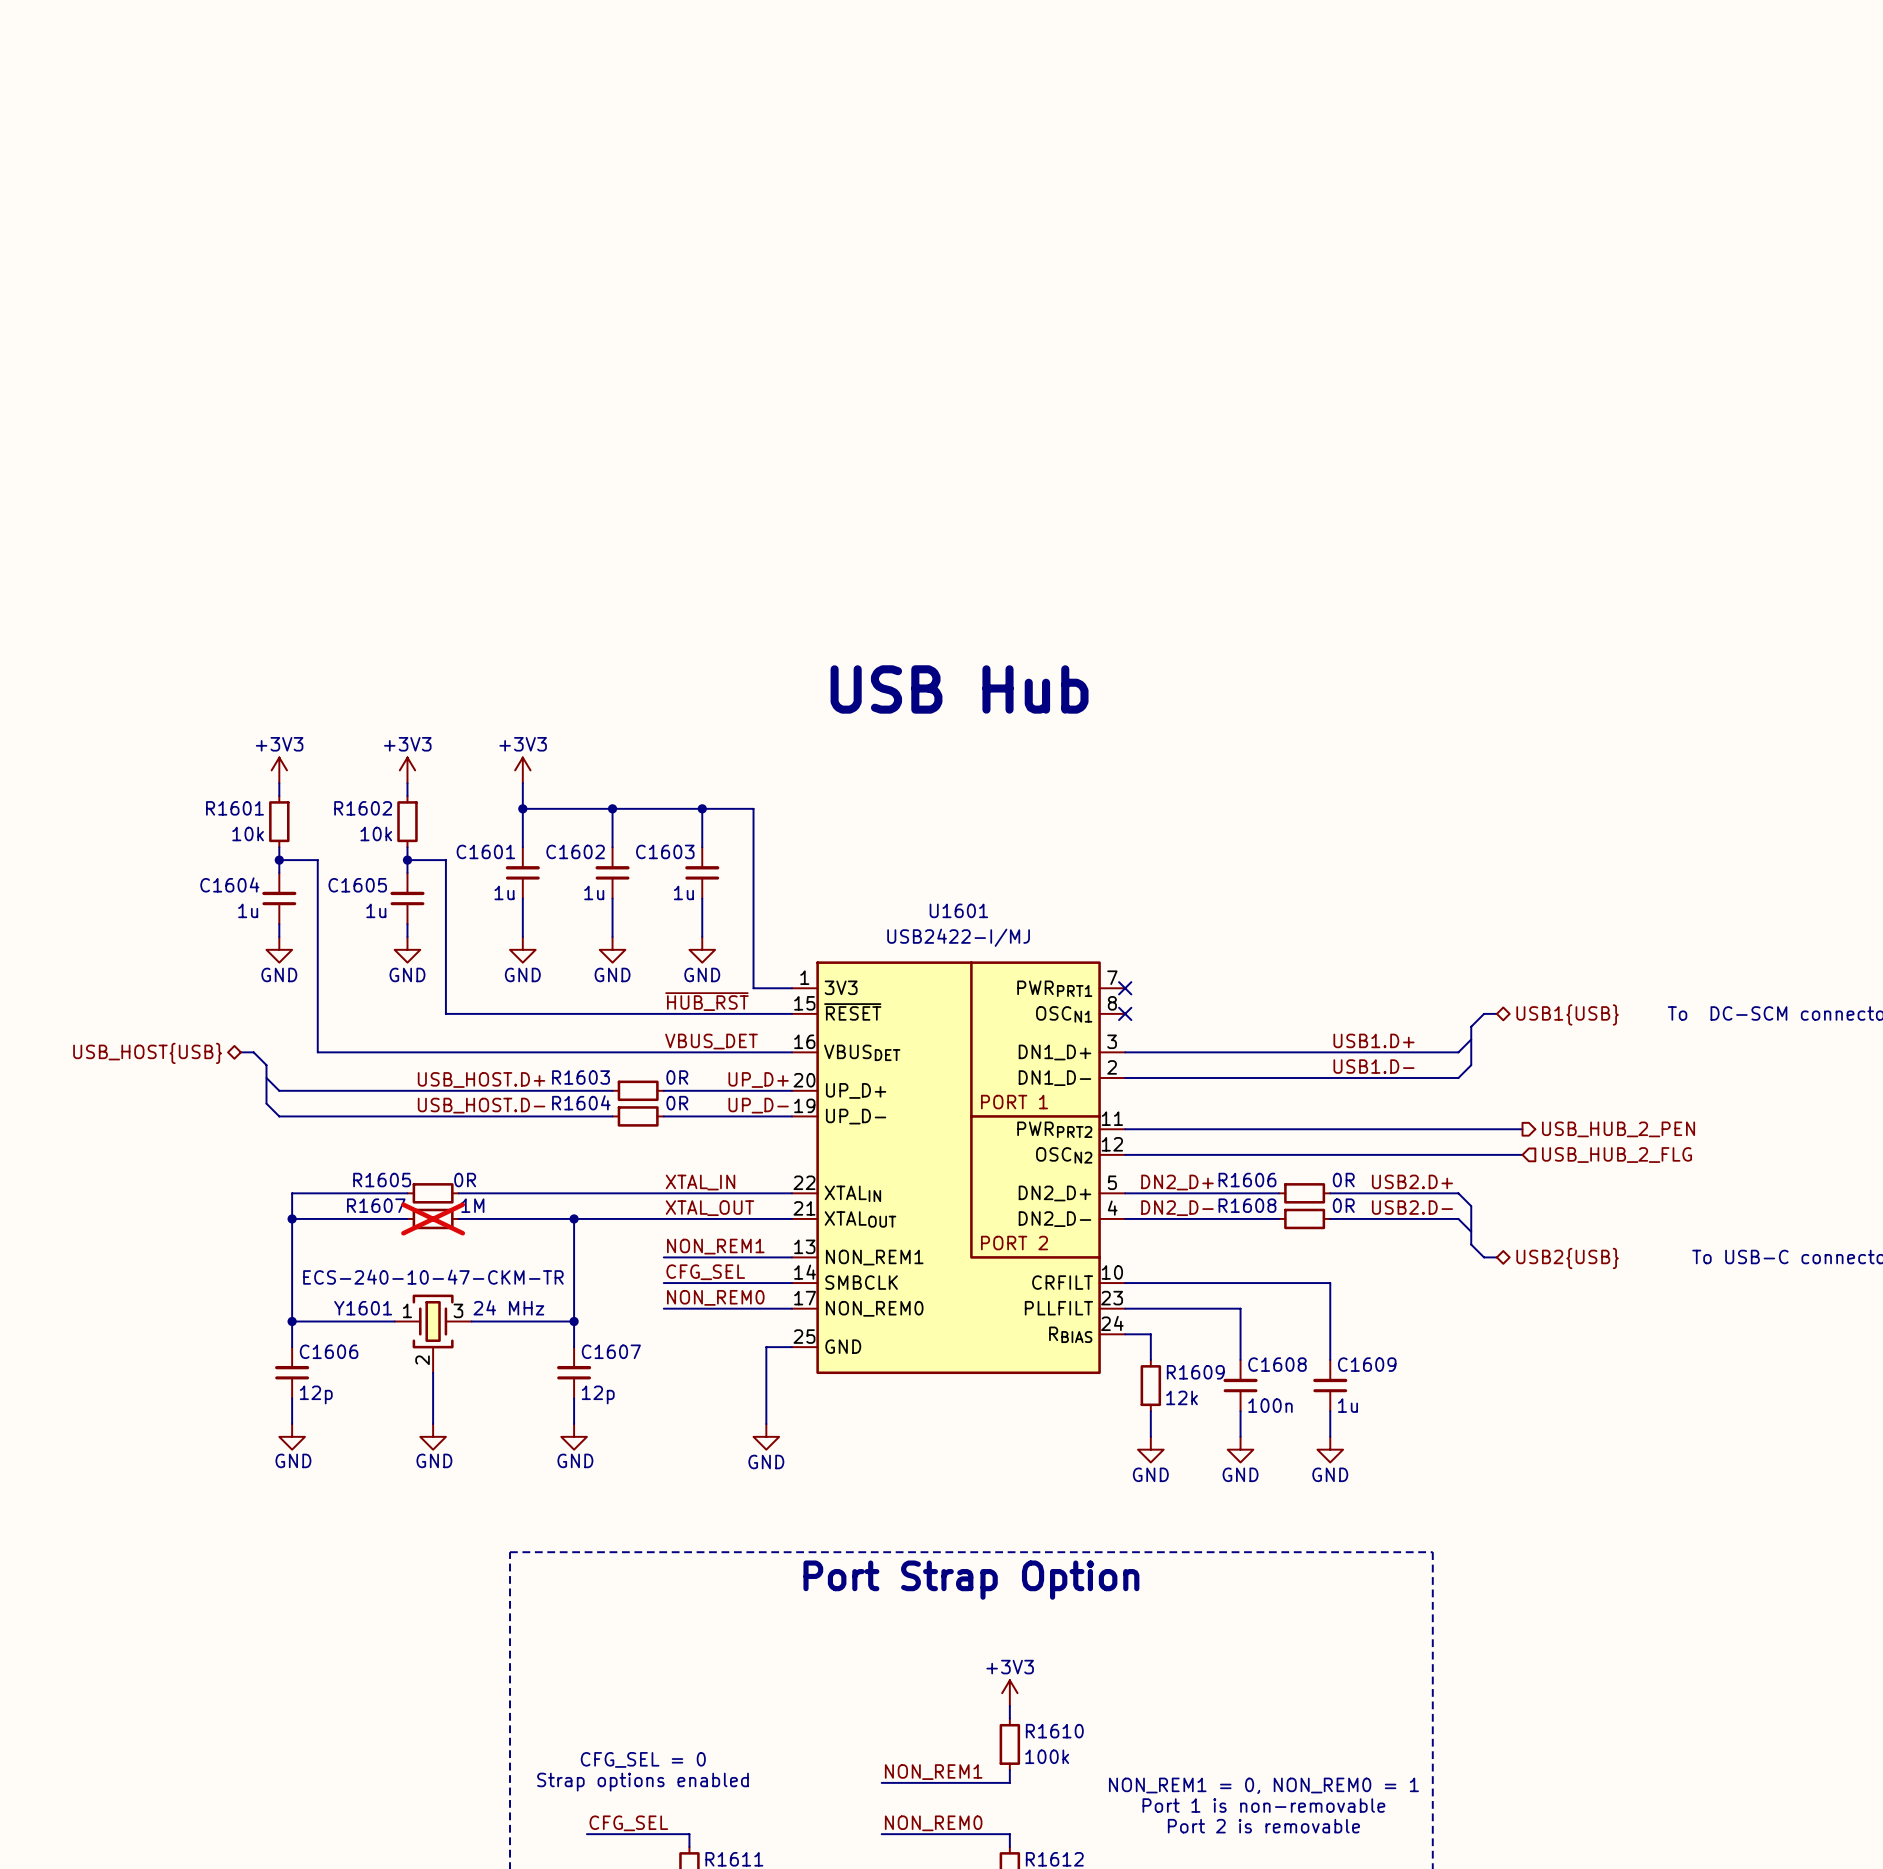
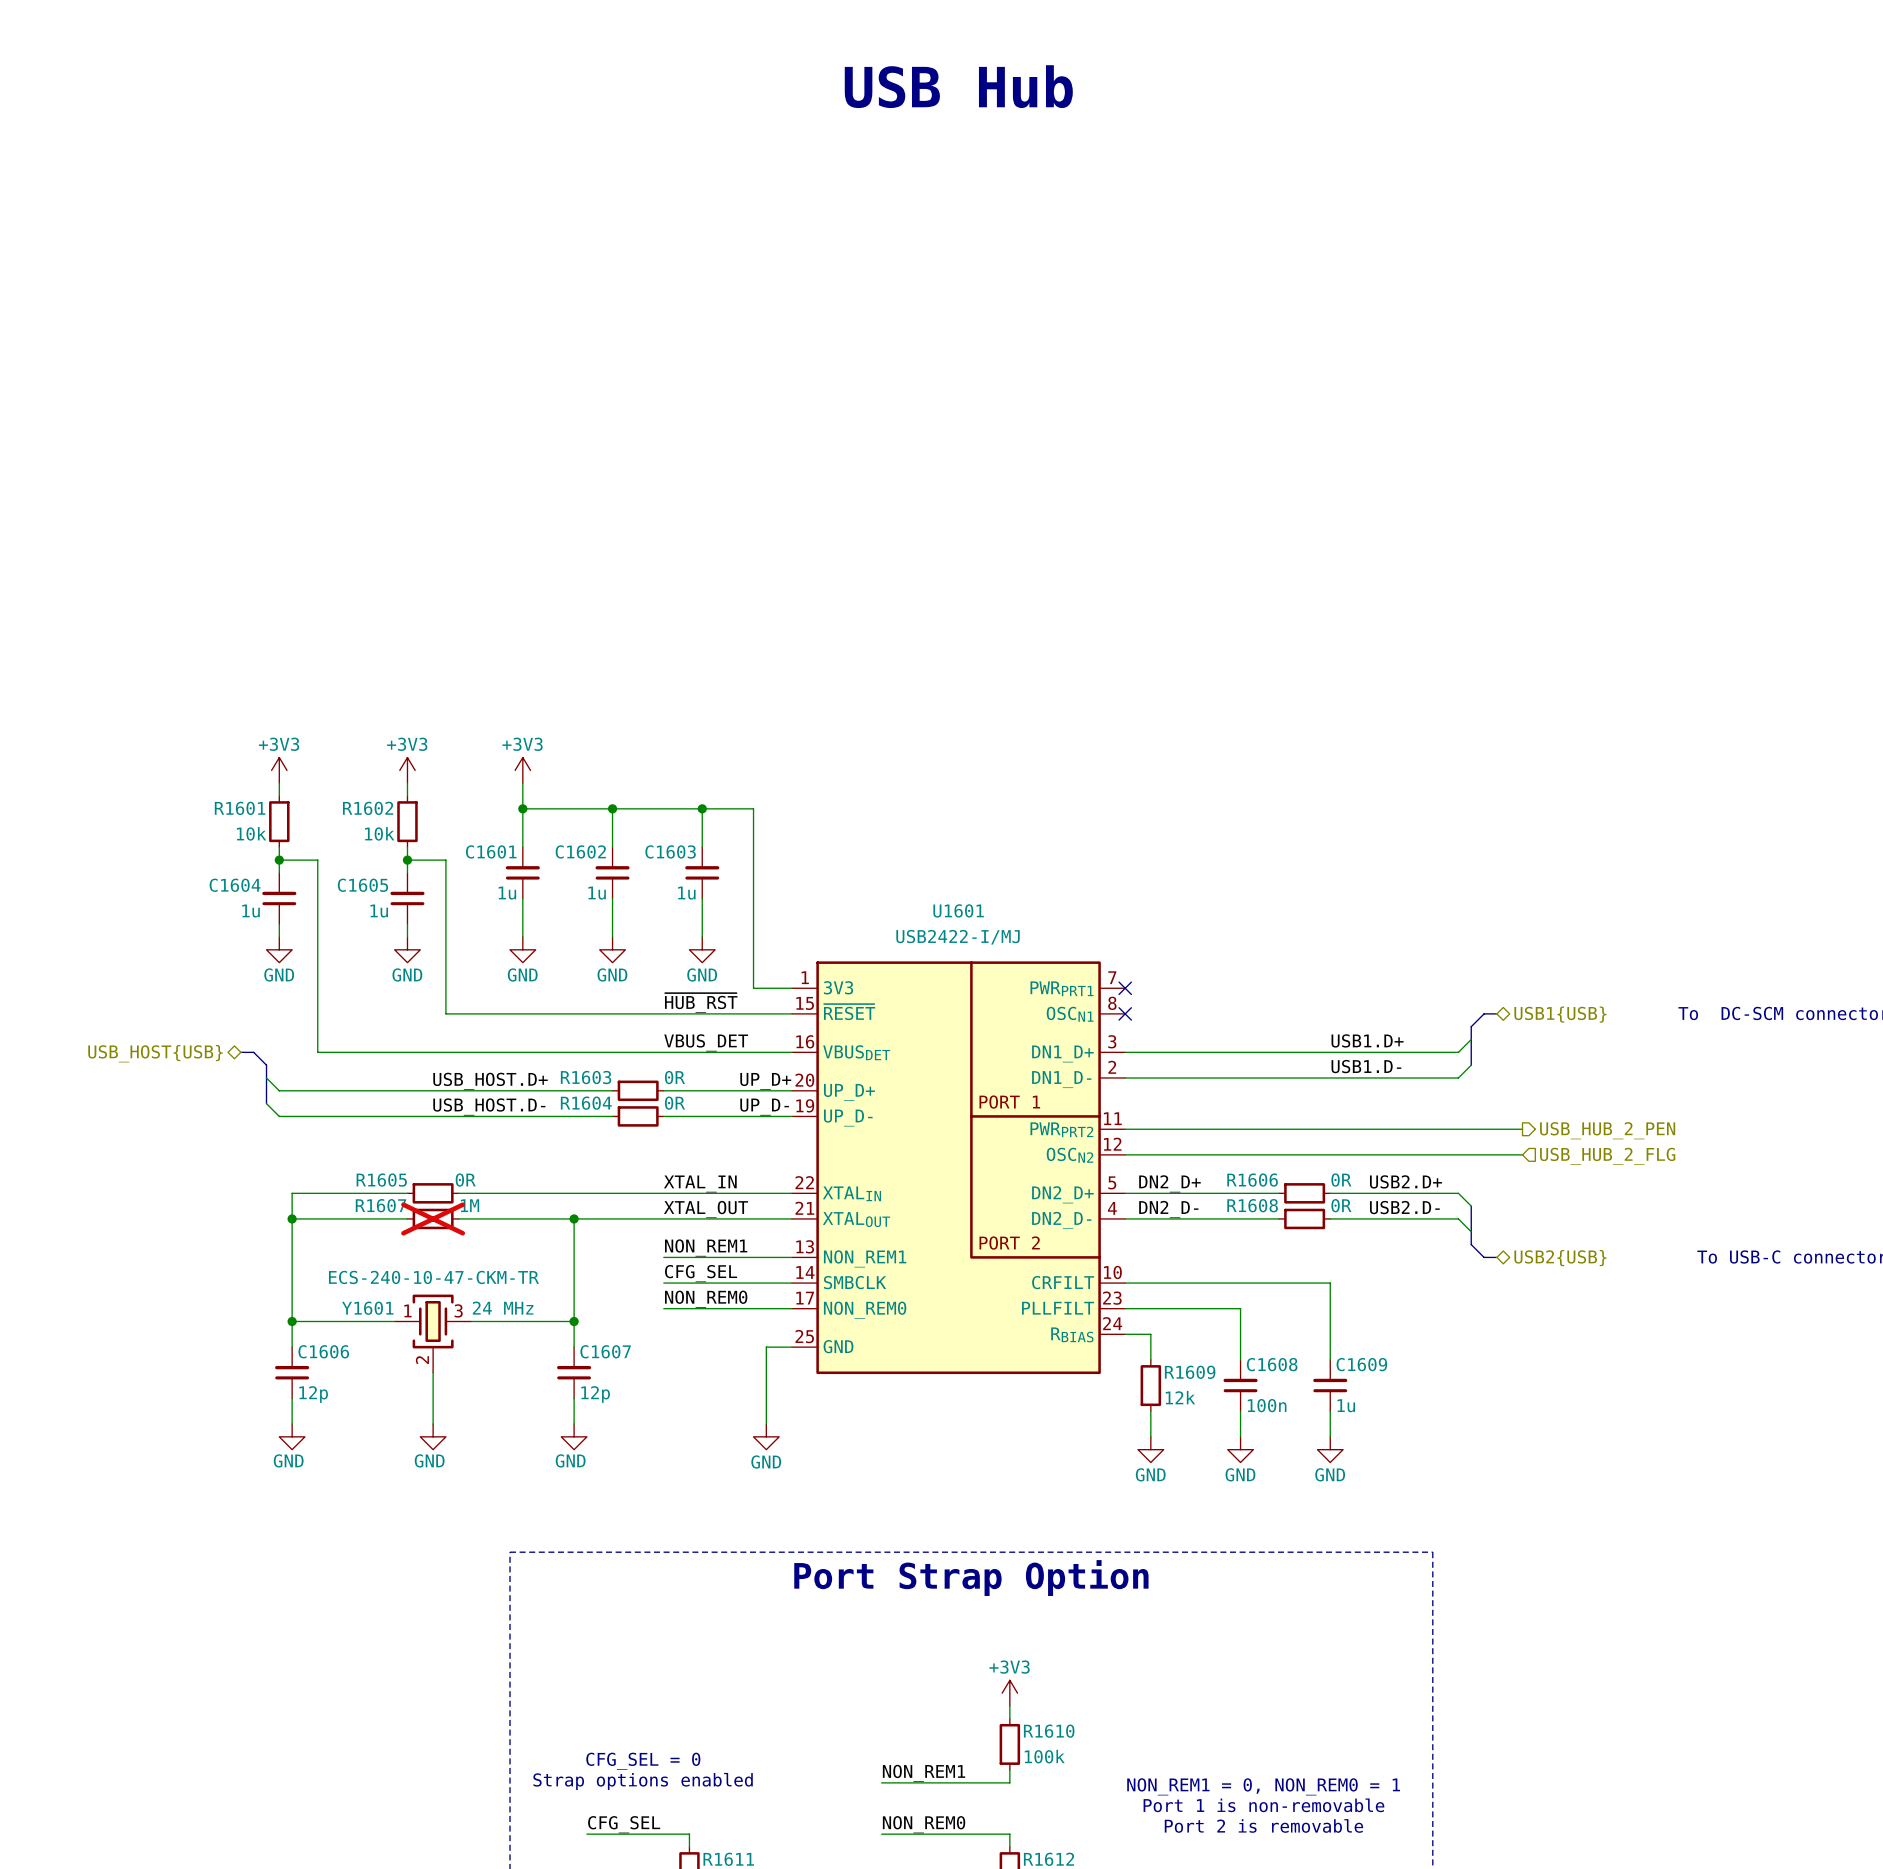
text: none -> USB Hub (958, 86)
text: USB Hub (959, 689) -> none

